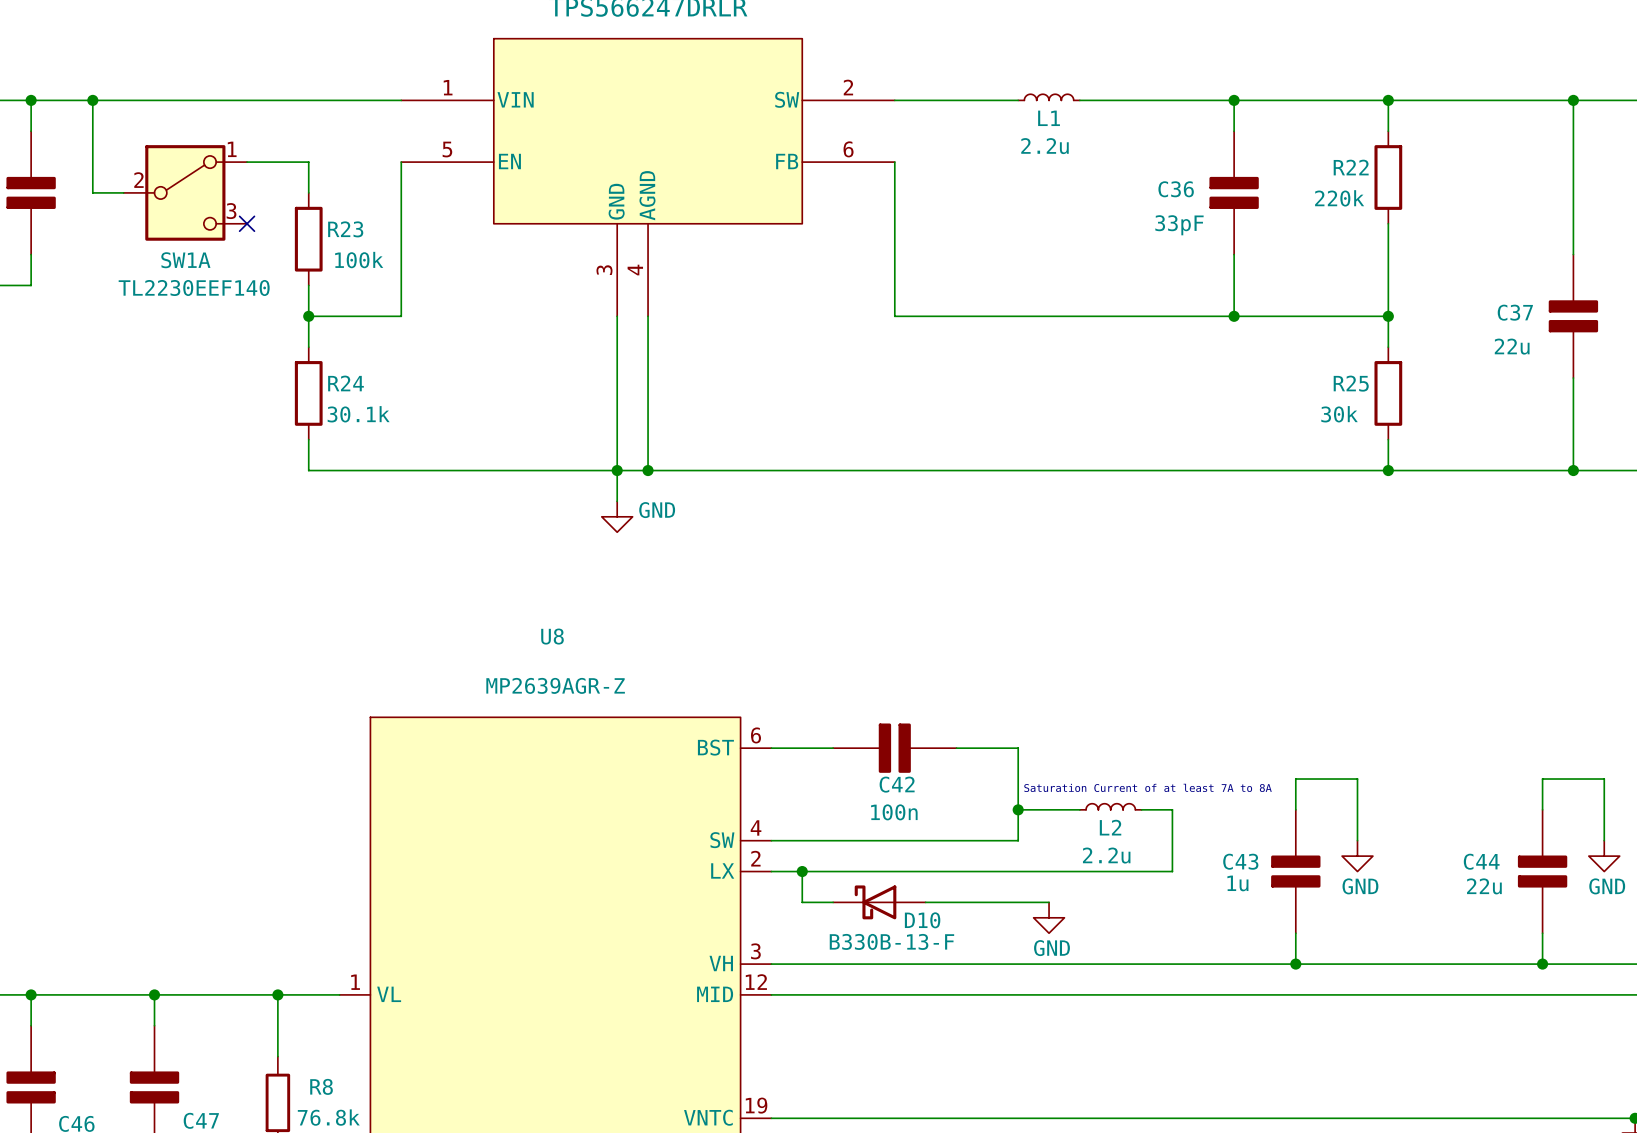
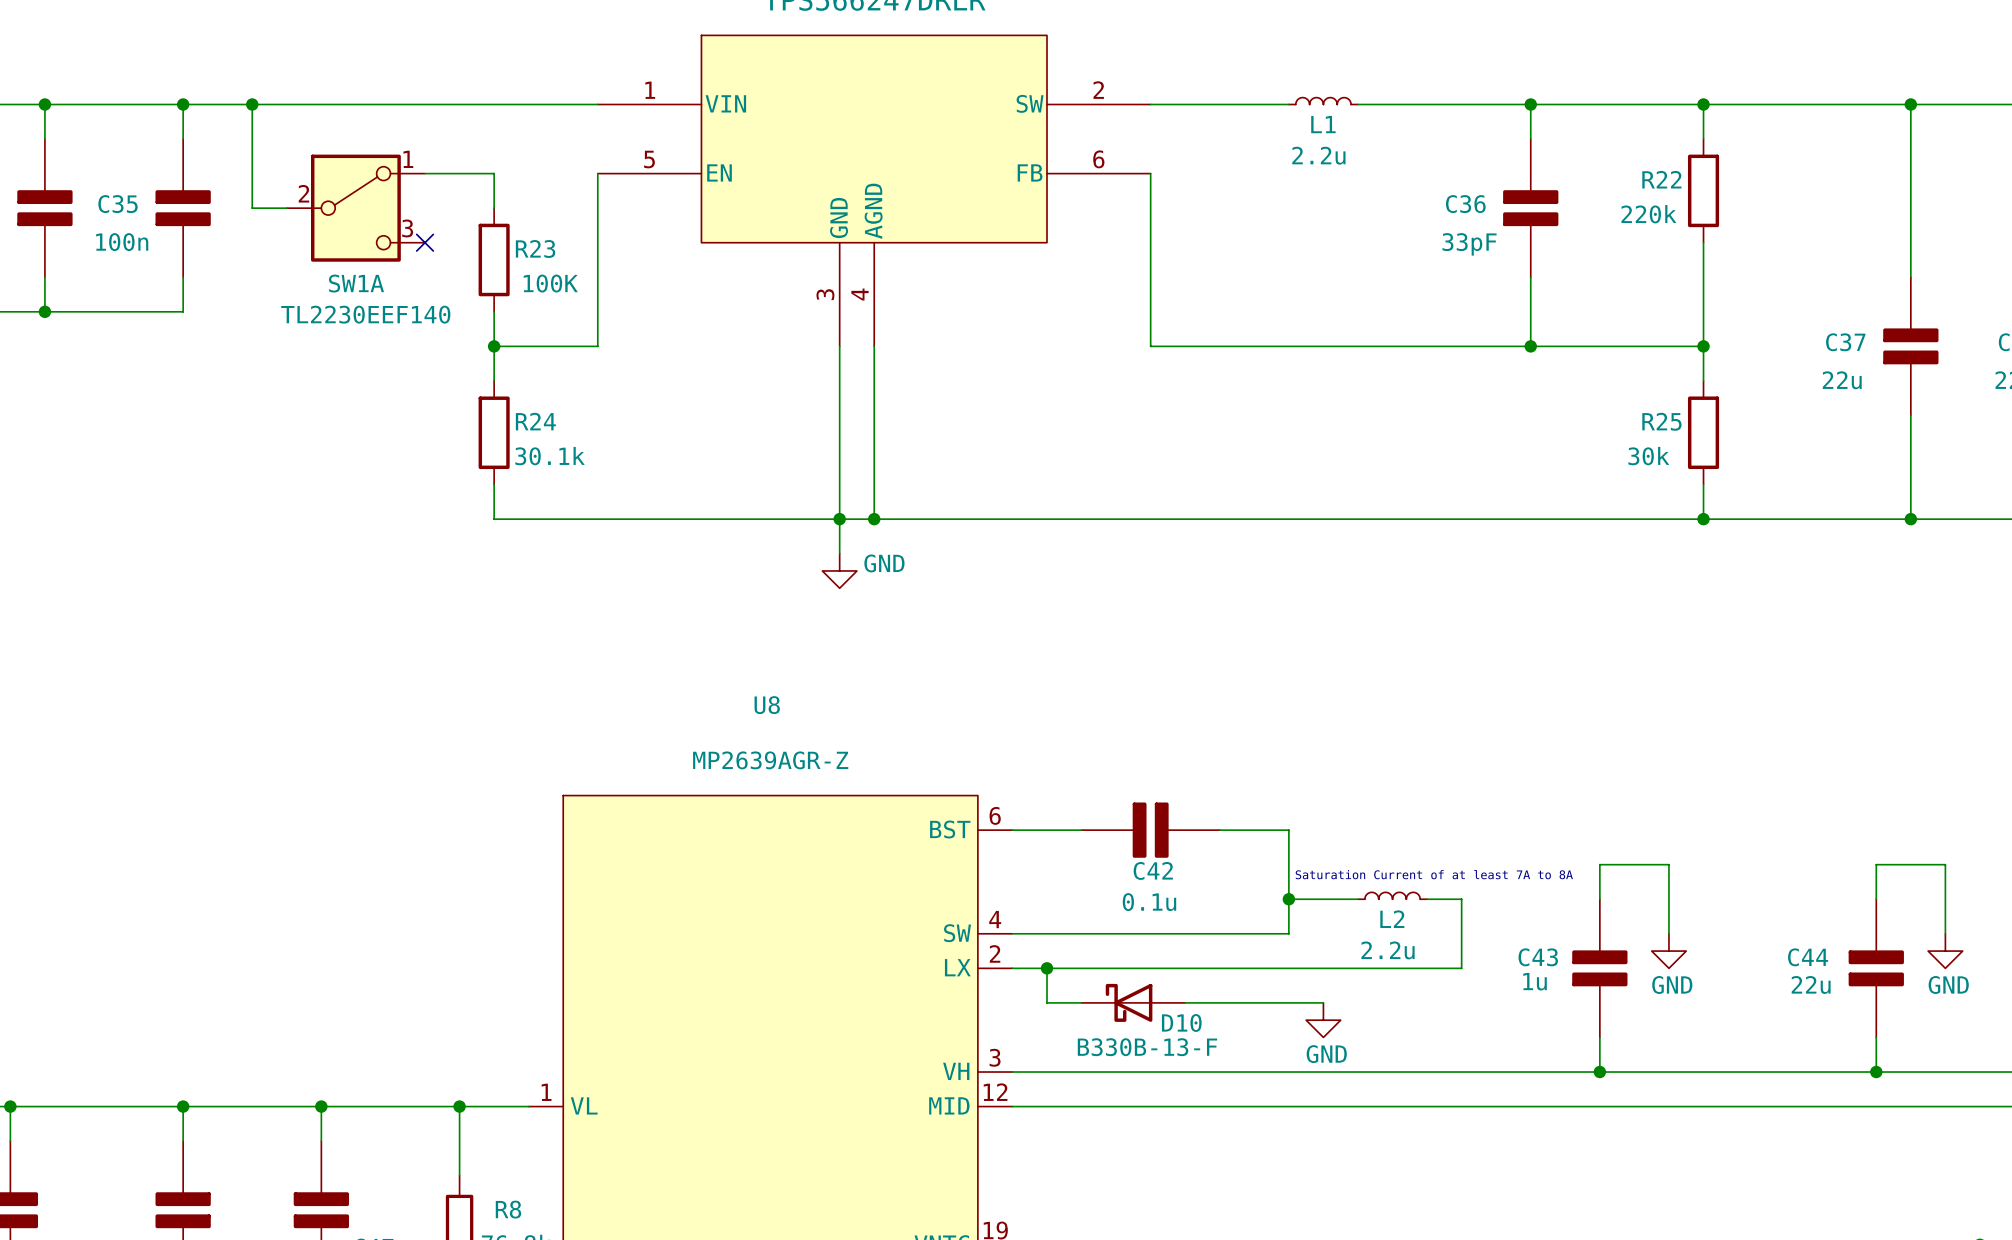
R23 value: 100k (359, 260) -> 100K (550, 283)
C42 value: 100n (894, 812) -> 0.1u (1149, 902)

